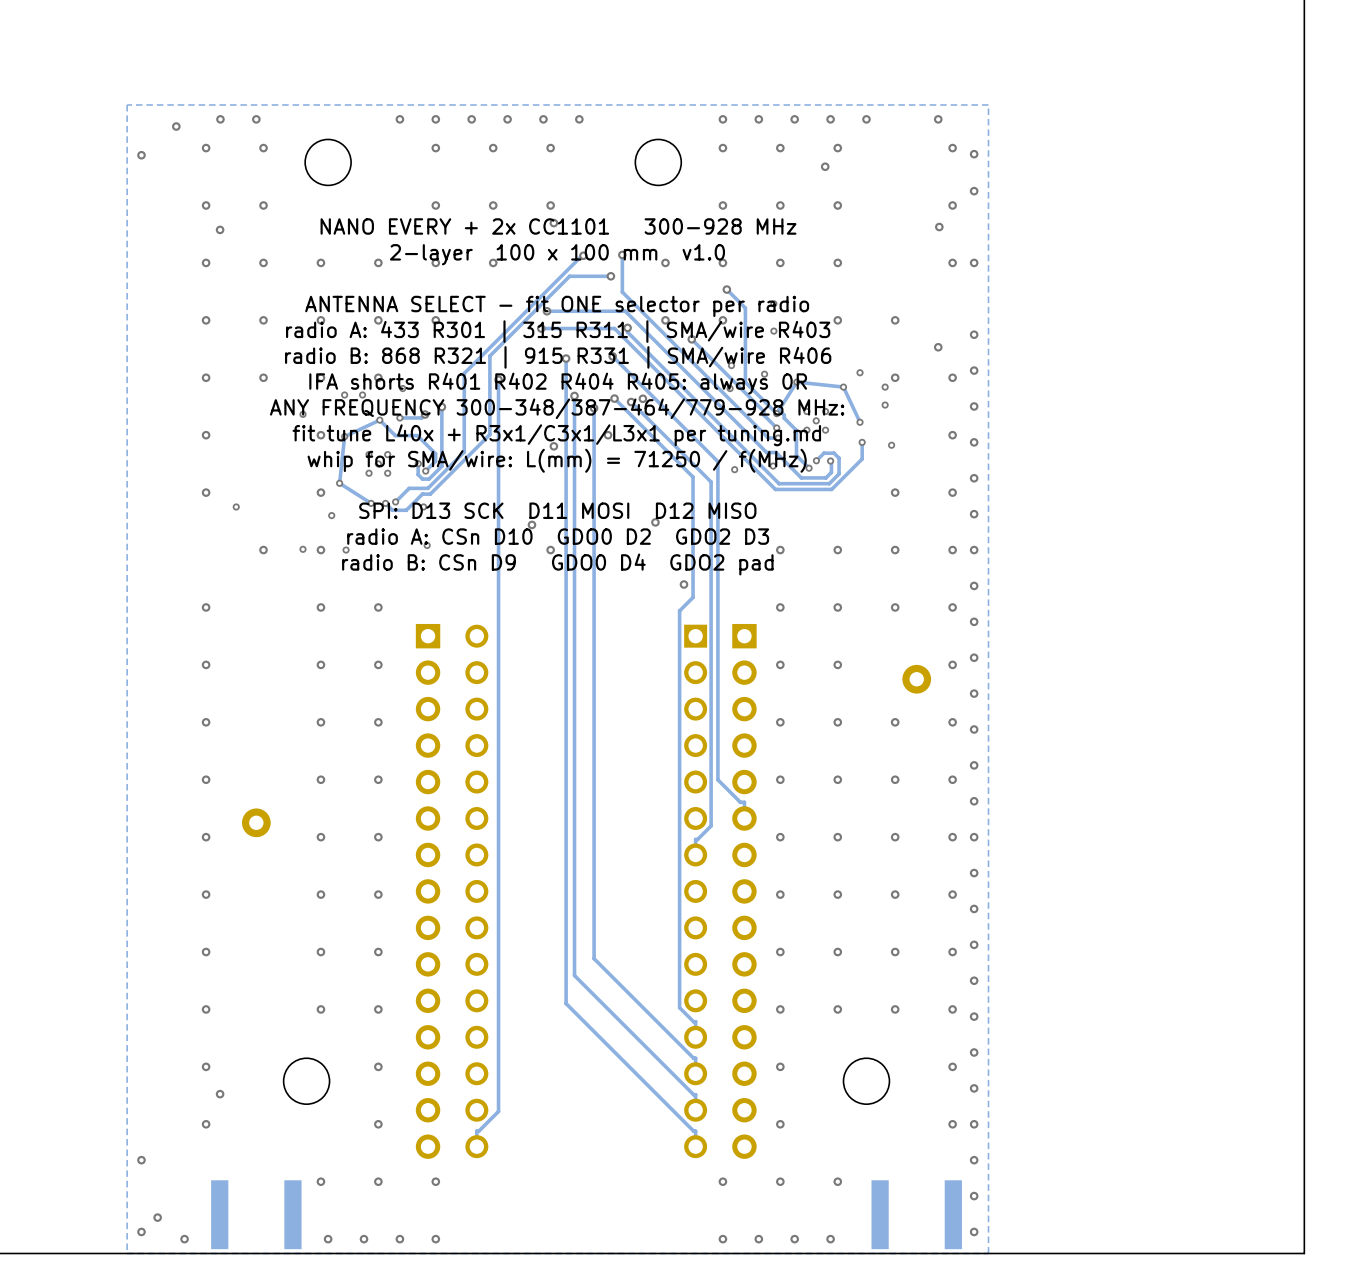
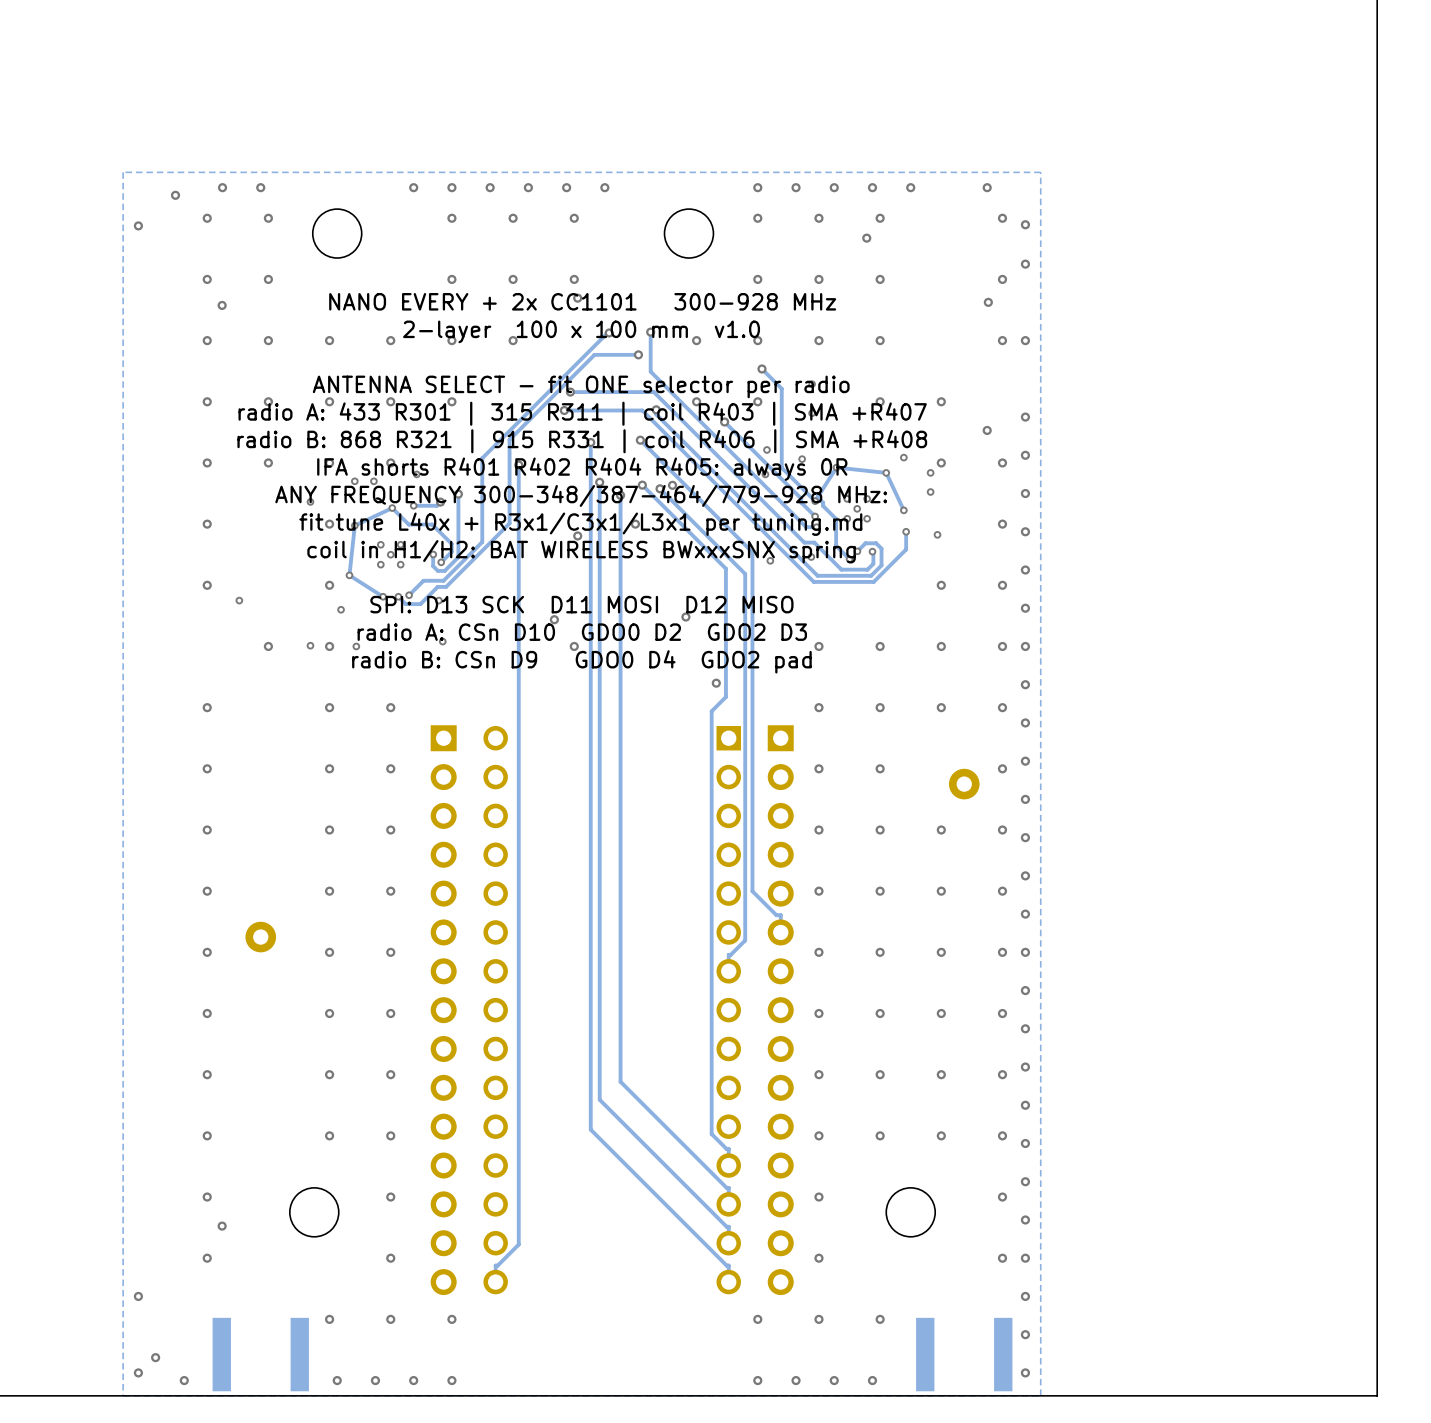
text: radio A: 433 R301 | 315 R311 | SMA/wire R403 (558, 331) -> radio A: 433 R301 | 315 R311 | coil R403 | SMA +R407 (582, 413)
text: radio B: 868 R321 | 915 R331 | SMA/wire R406 (558, 357) -> radio B: 868 R321 | 915 R331 | coil R406 | SMA +R408 (582, 441)
text: whip for SMA/wire: L(mm) = 71250 / f(MHz) (557, 460) -> coil in H1/H2: BAT WIRELESS BWxxxSNX spring (581, 551)

